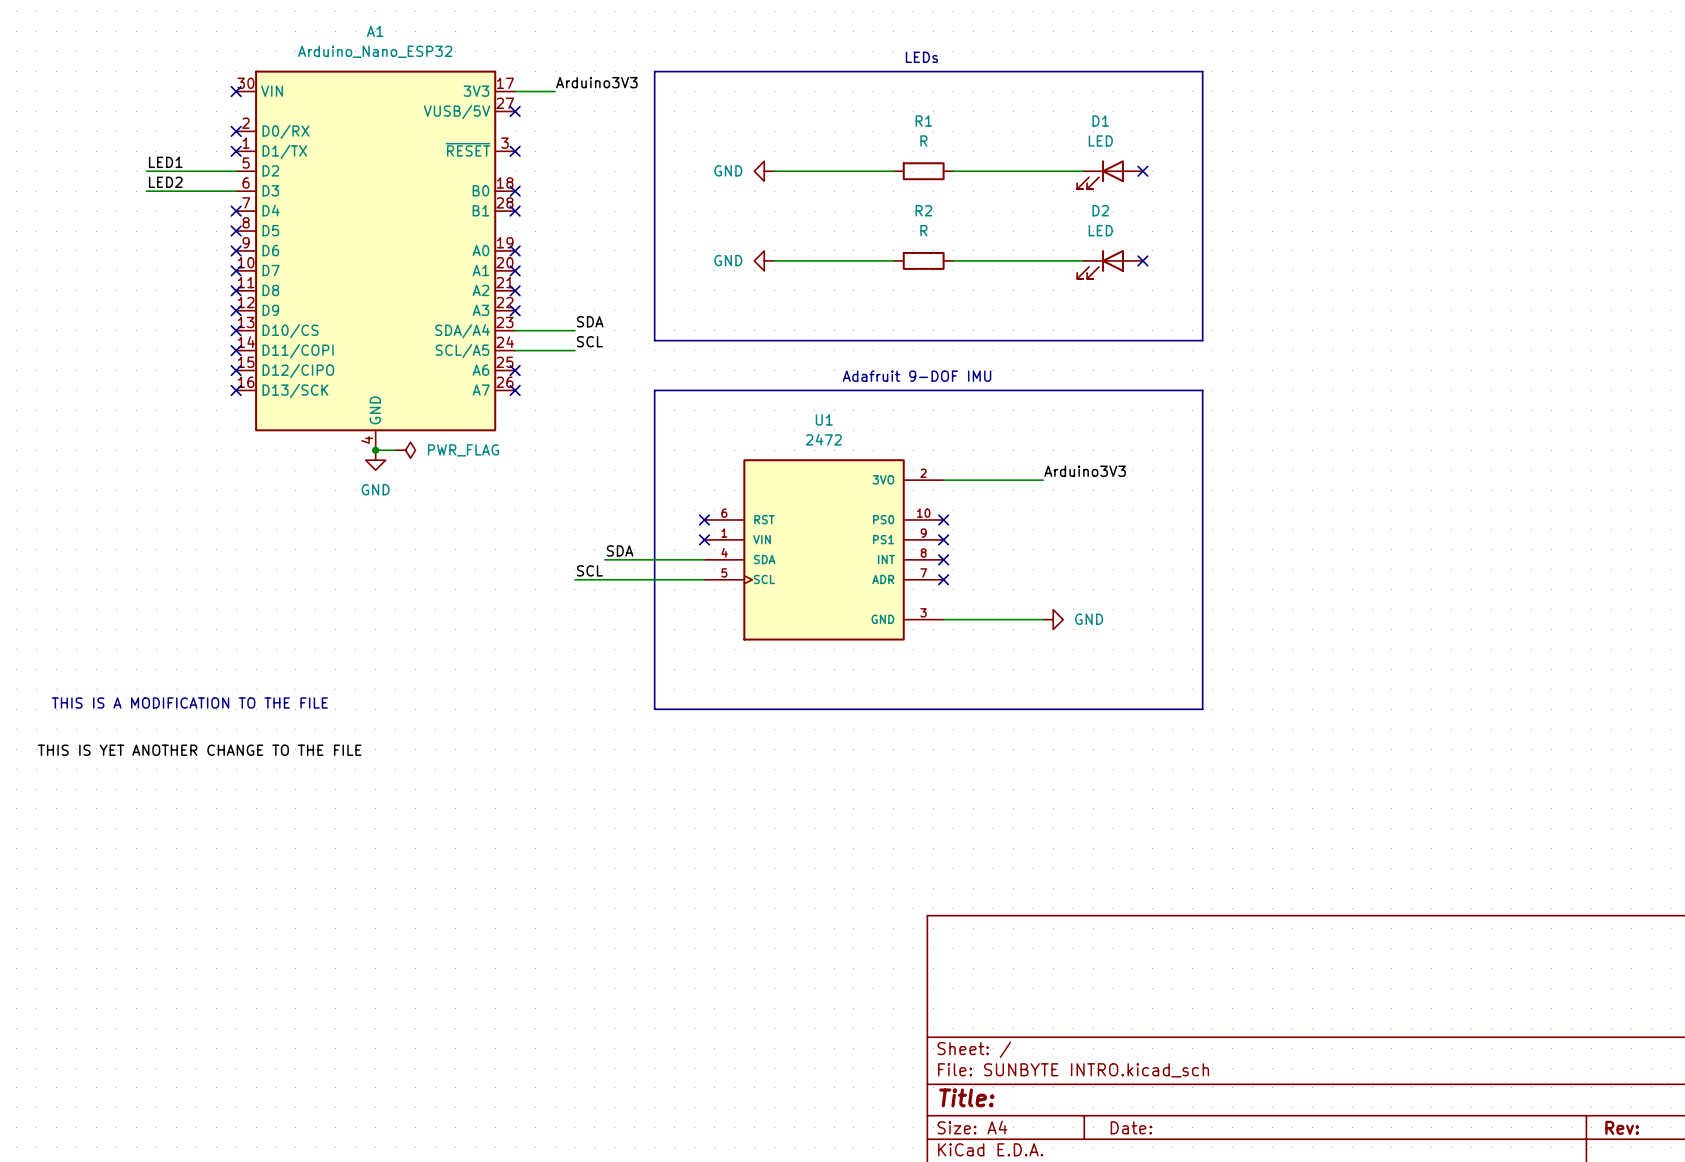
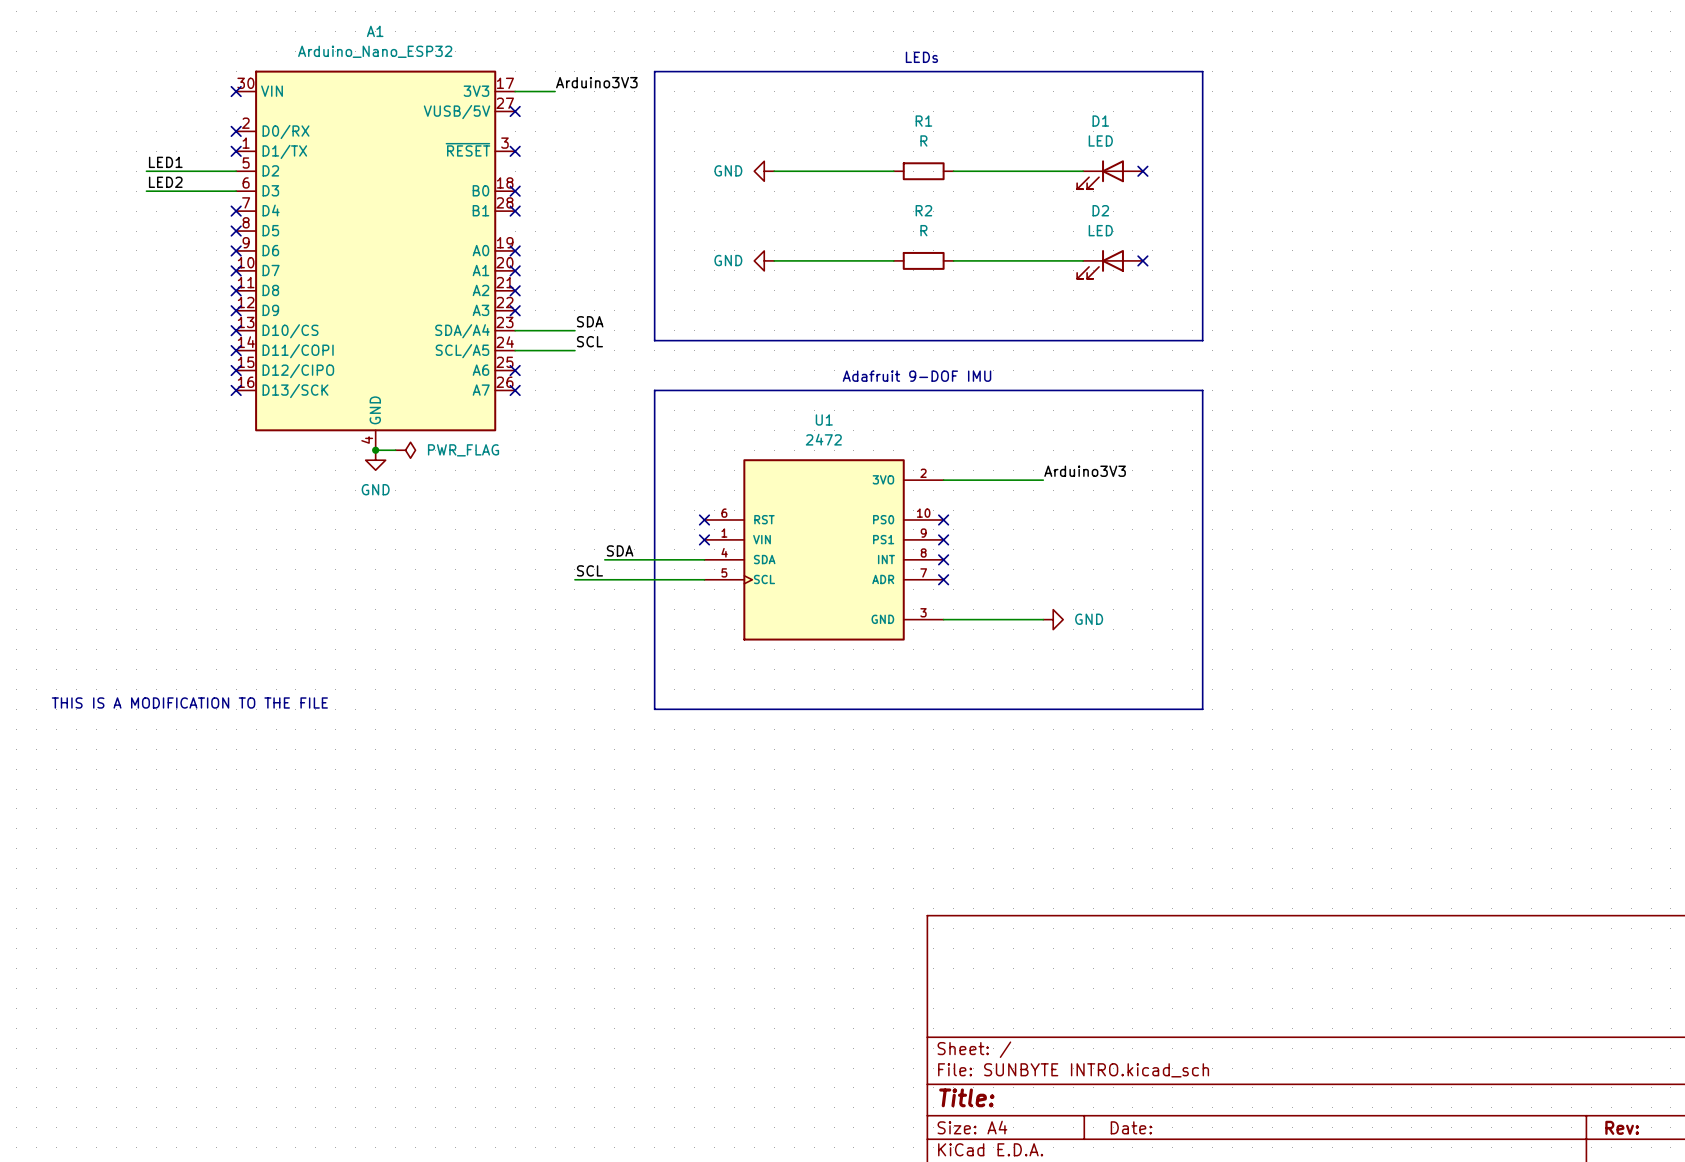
label: THIS IS YET ANOTHER CHANGE TO THE FILE (199, 750) -> none

